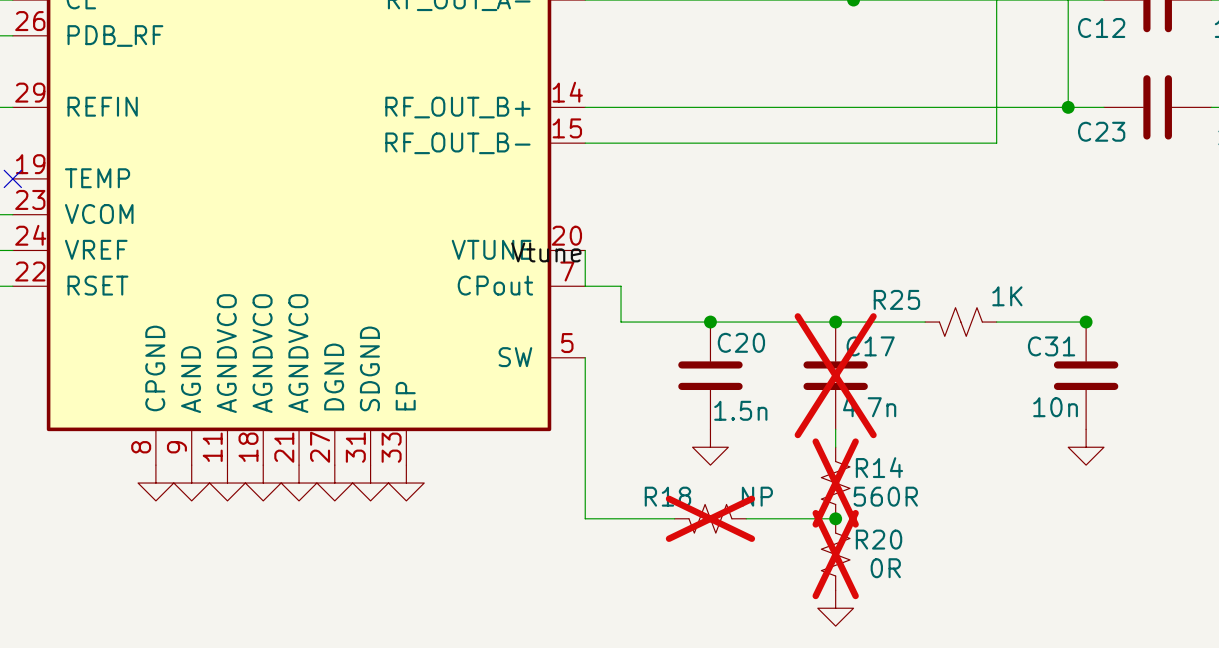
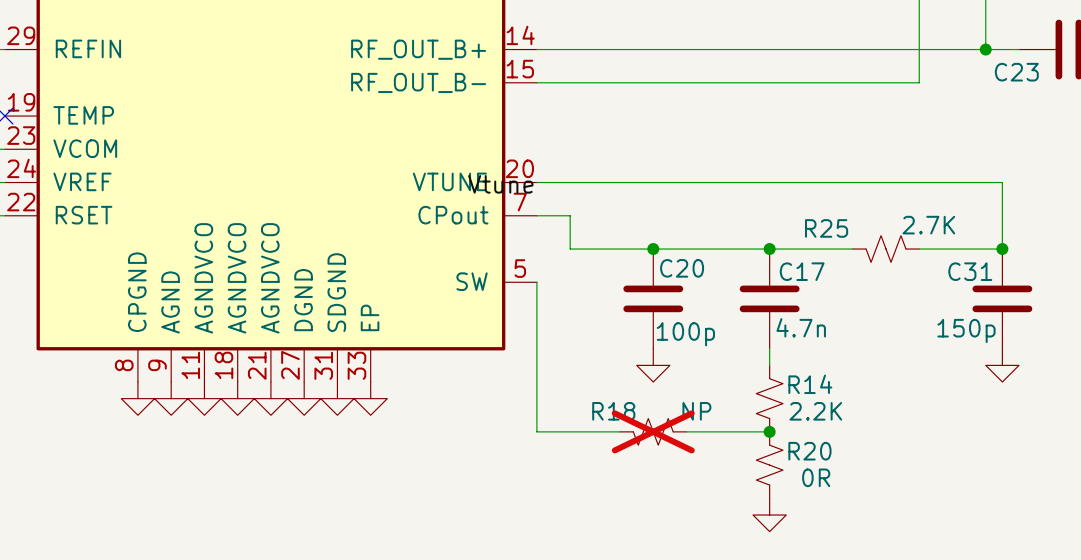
wire: (585, 250) (585, 286) -> (536, 182) (1002, 182) (1002, 249)
R25 value: 1K (1007, 296) -> 2.7K (928, 225)
C17 do-not-place cross: (835, 375) -> none
C31 value: 10n (1055, 407) -> 150p (966, 330)
C20 value: 1.5n (740, 410) -> 100p (685, 334)
R14 do-not-place cross: (835, 483) -> none
R14 value: 560R (885, 496) -> 2.2K (815, 411)
R20 do-not-place cross: (835, 554) -> none

